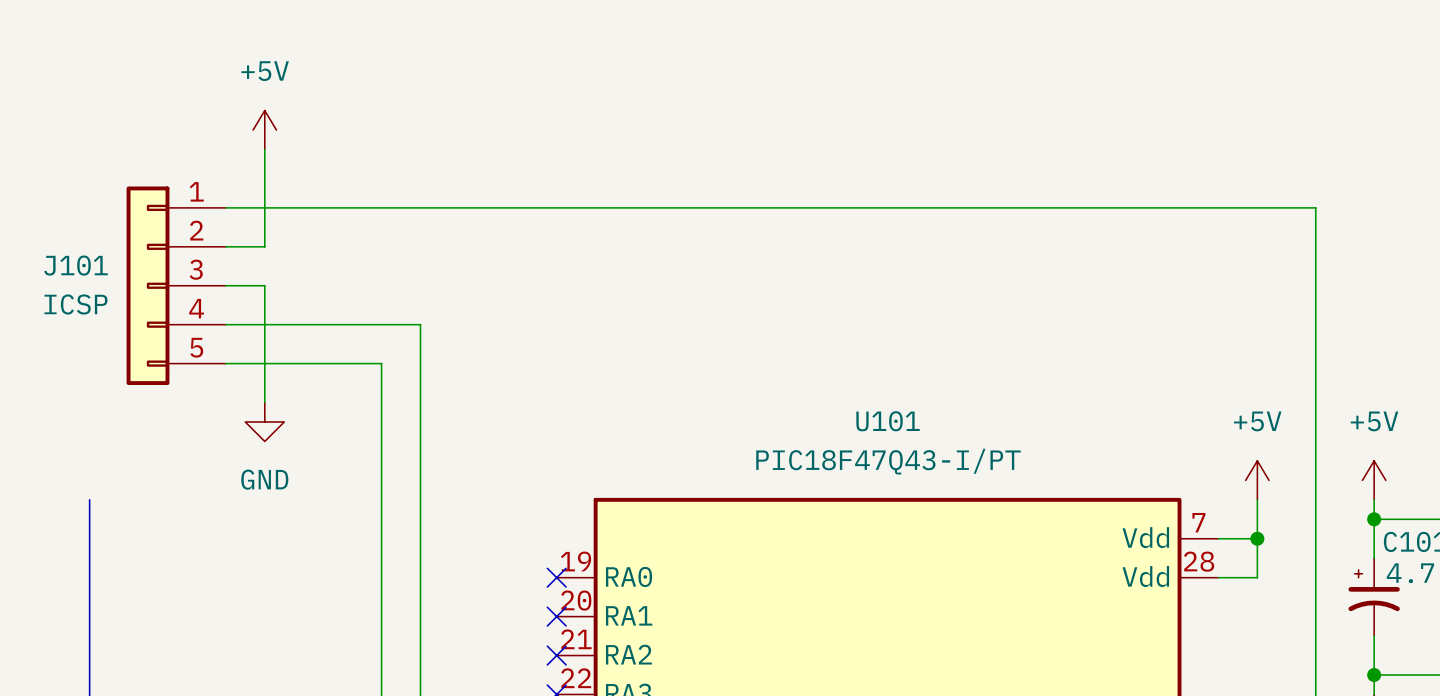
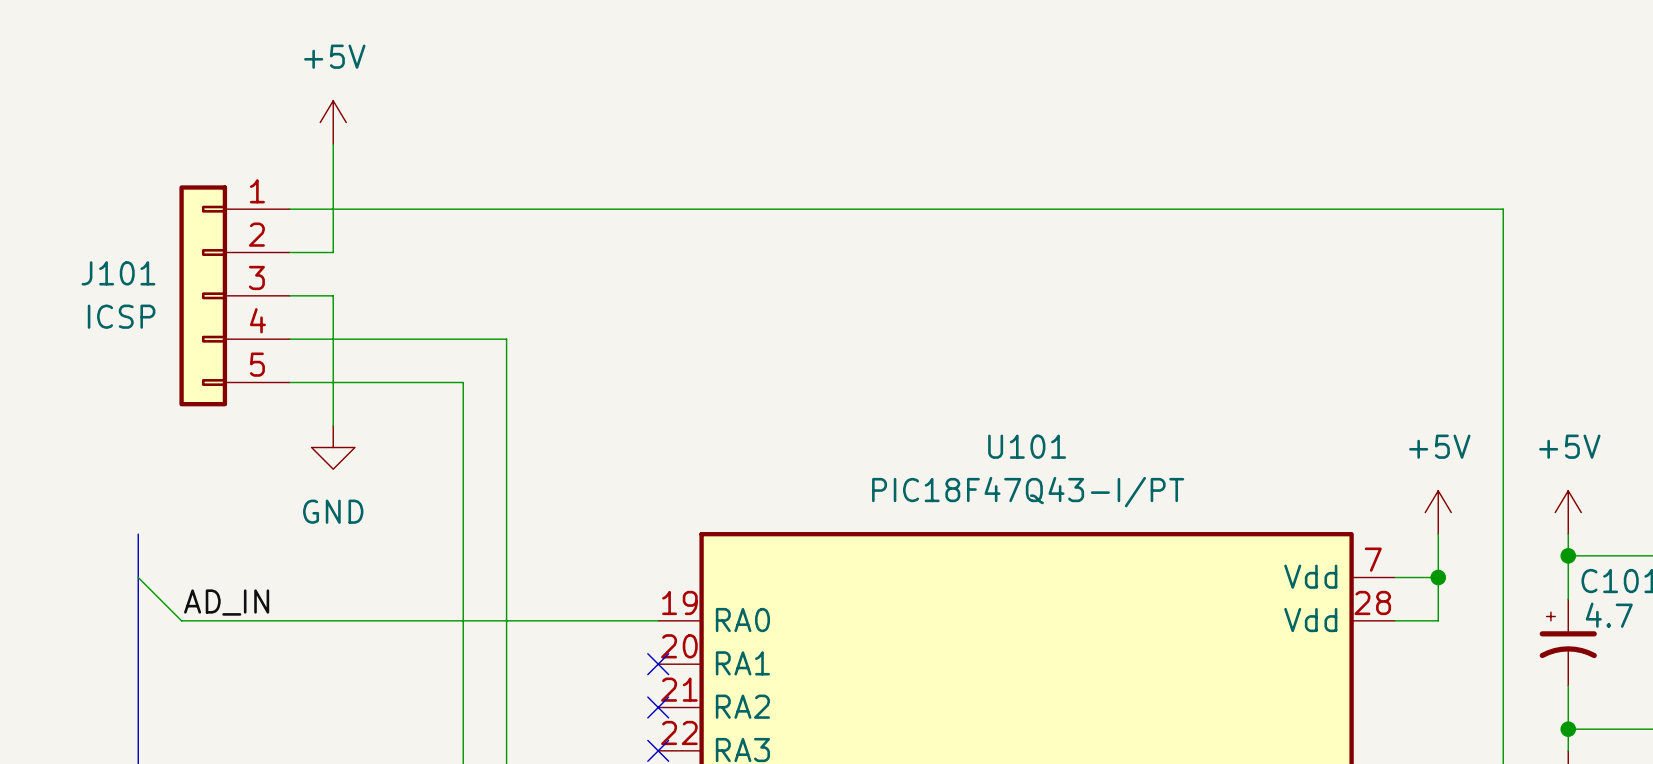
wire: none -> (138, 577) (181, 620) (658, 620)
label: none -> AD_IN (226, 602)
no-connect mark: (556, 577) -> none

